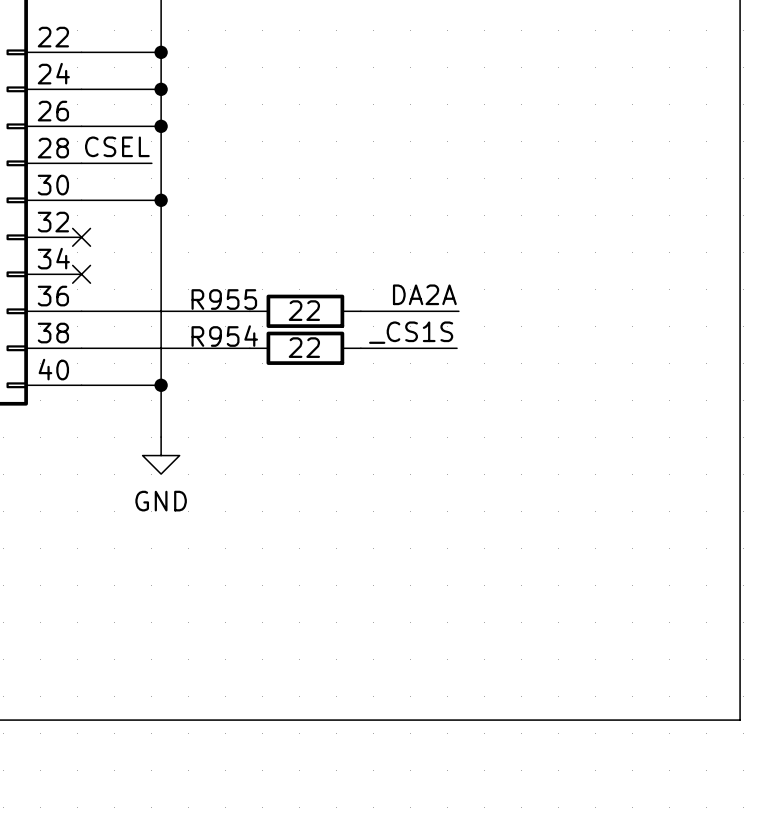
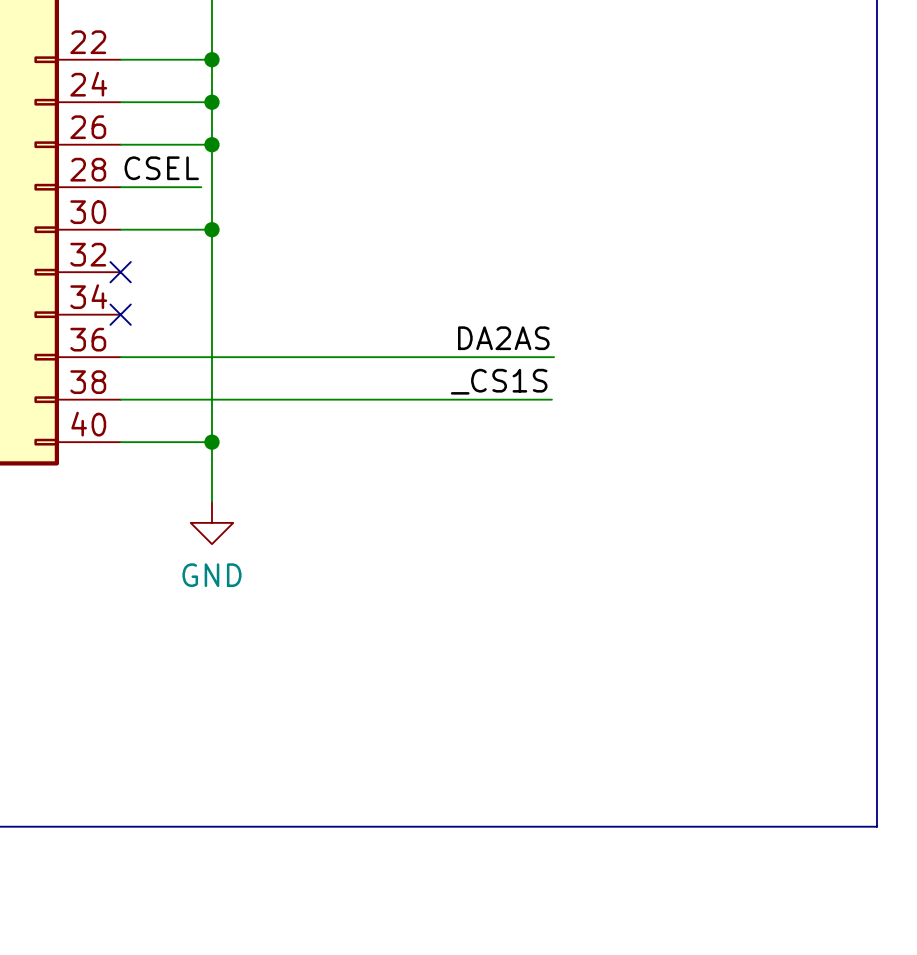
label: DA2A (424, 294) -> DA2AS (503, 338)
wire: none -> (313, 357) (441, 357)
R955: 22 (305, 311) -> none
wire: none -> (313, 399) (441, 399)
R954: 22 (305, 348) -> none

